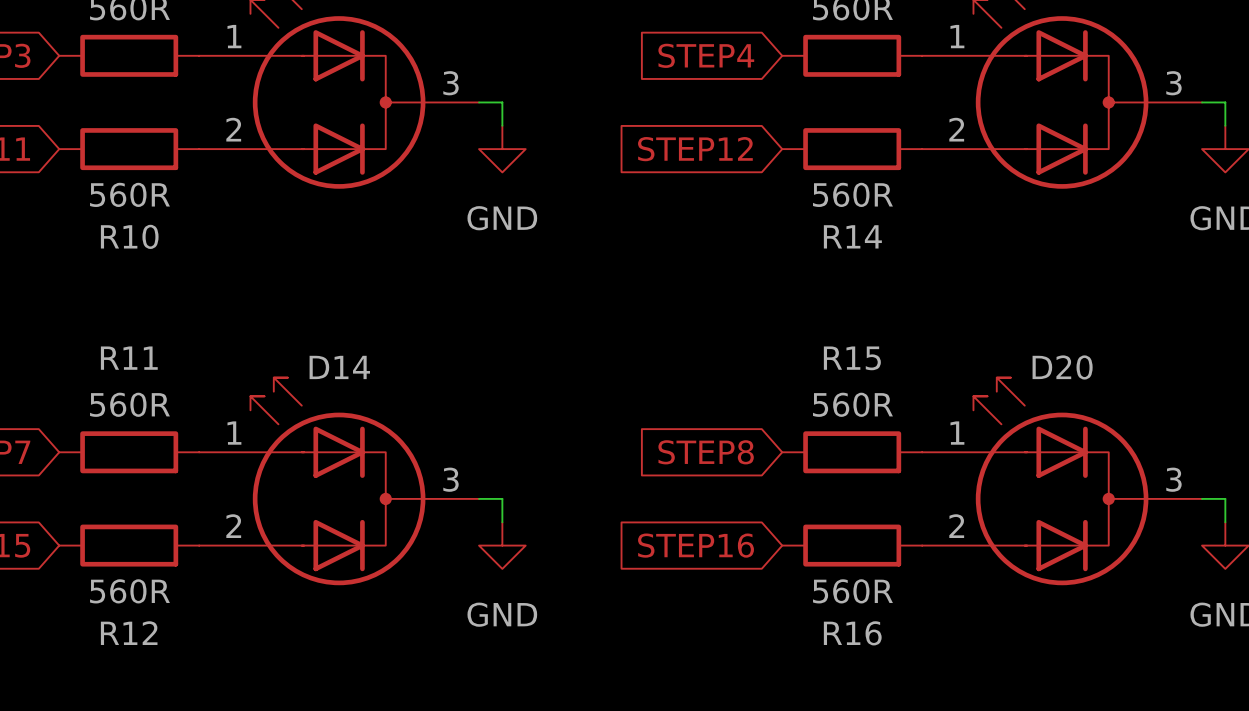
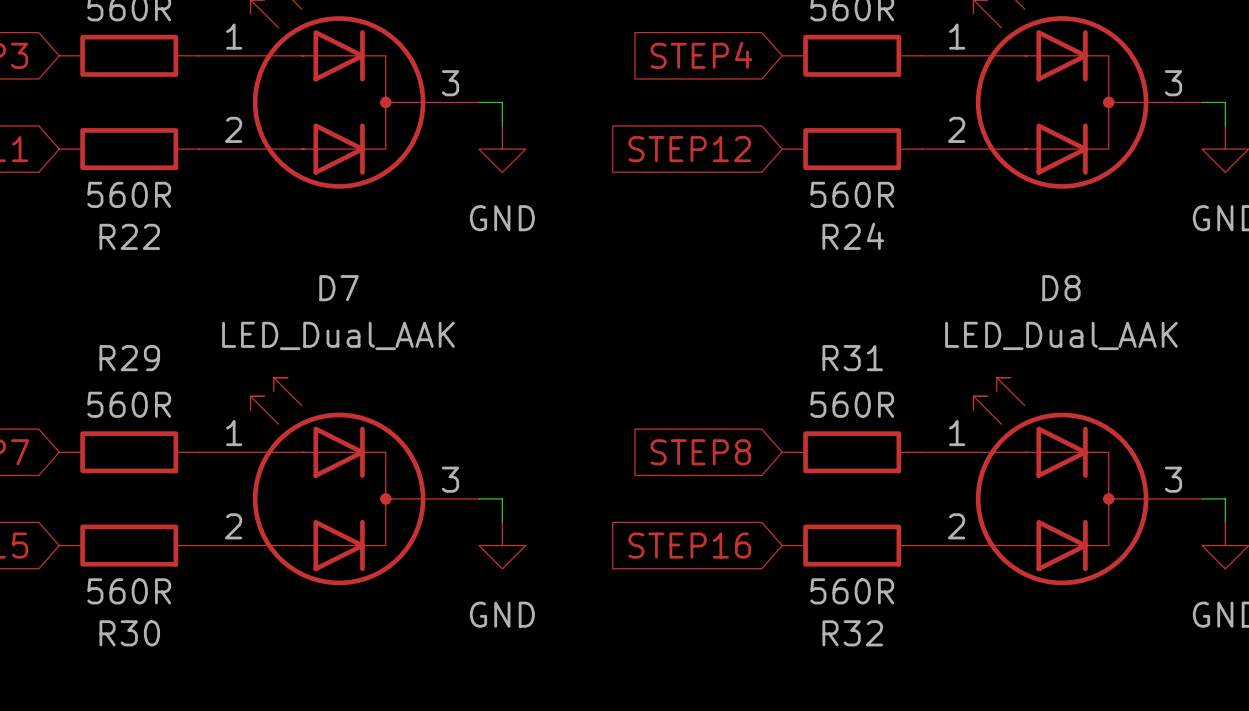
R10 name: R10 (129, 236) -> R22 (129, 236)
R14 name: R14 (852, 236) -> R24 (853, 236)
D14 value: none -> LED_Dual_AAK (338, 335)
D20 value: none -> LED_Dual_AAK (1061, 335)
R11 name: R11 (129, 358) -> R29 (129, 358)
R15 name: R15 (852, 358) -> R31 (852, 358)
D14 name: D14 (339, 367) -> D7 (339, 288)
D20 name: D20 (1062, 367) -> D8 (1061, 288)
R12 name: R12 (129, 633) -> R30 (129, 633)
R16 name: R16 (852, 633) -> R32 (852, 633)

